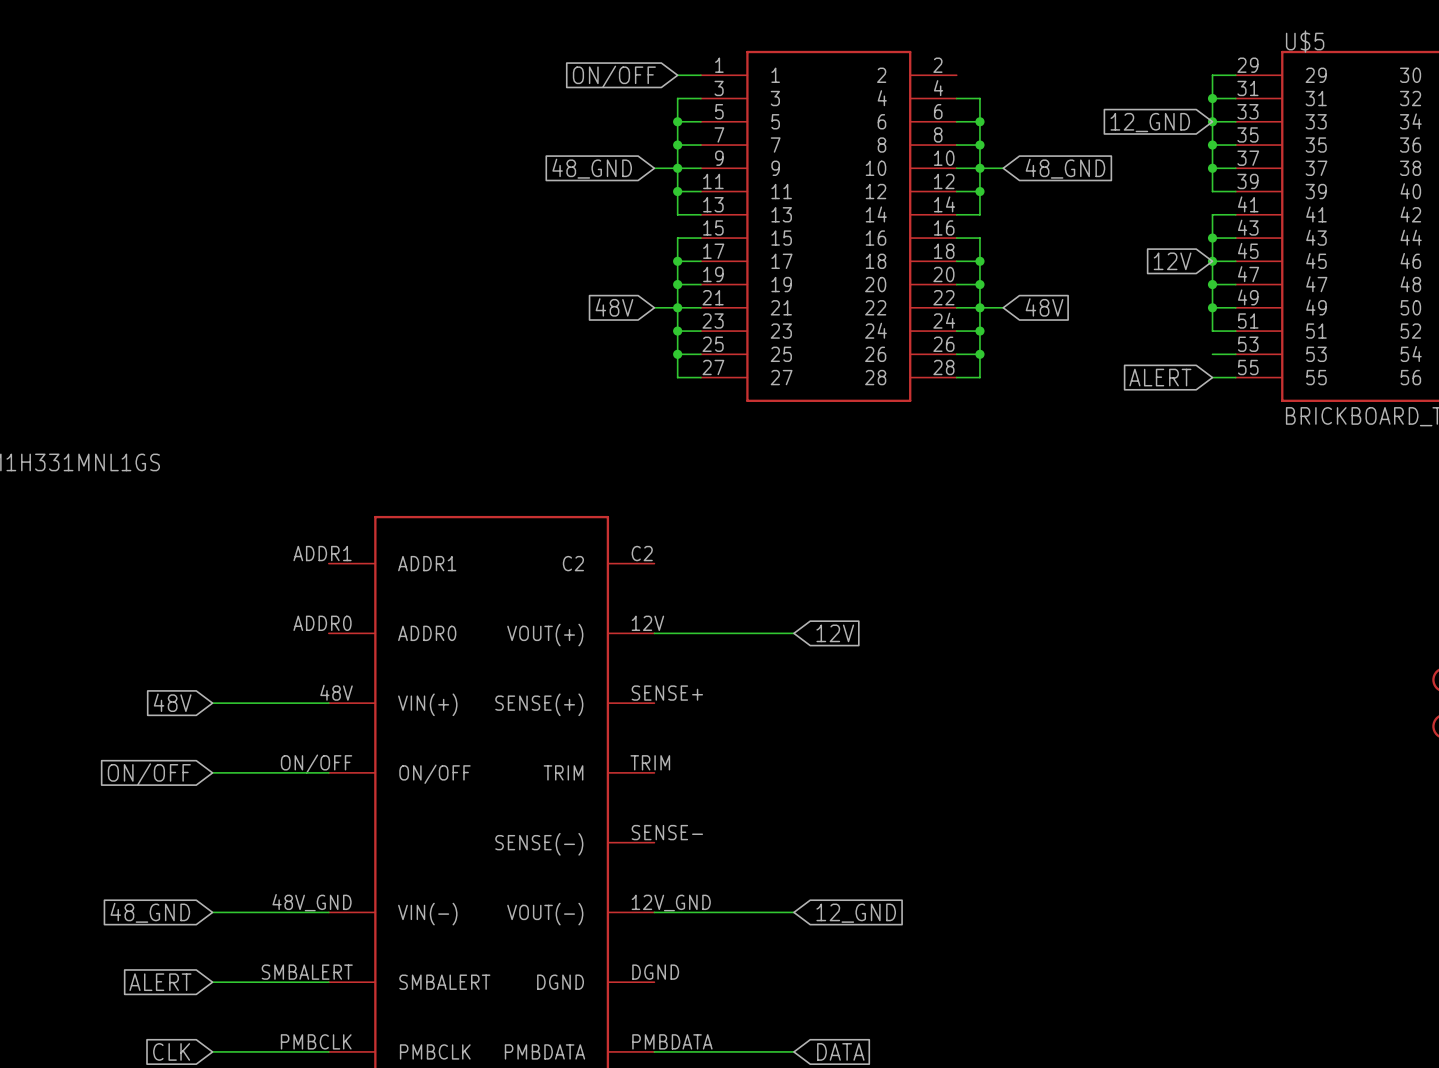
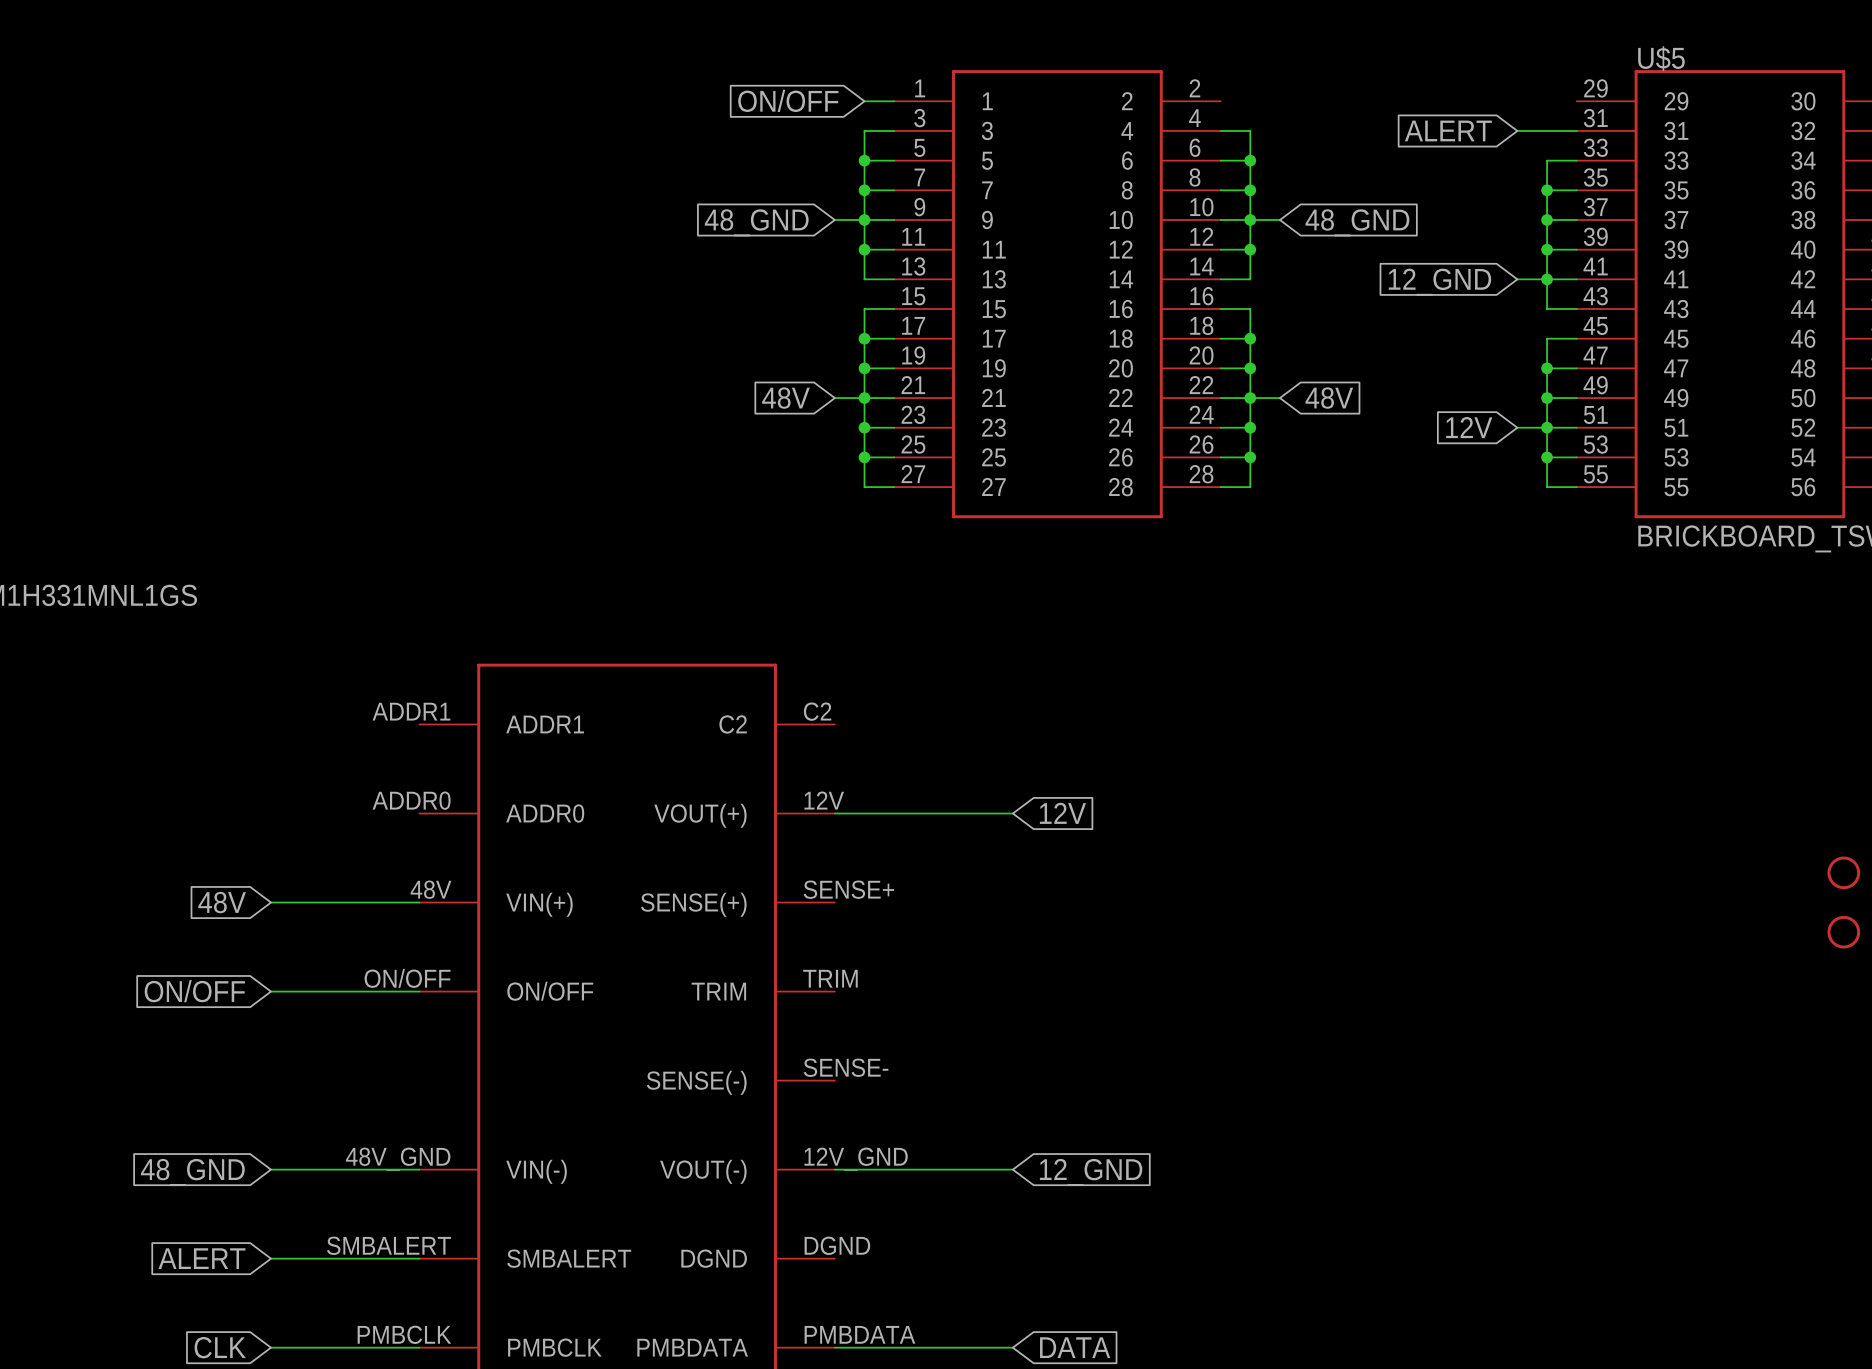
wire: (1235, 75) (1212, 75) (1212, 121) -> none
global label: none -> ALERT (1448, 130)
wire: none -> (1517, 130) (1547, 130)
junction: (1212, 98) -> none
junction: (1212, 121) -> none
global label position: 12_GND (1150, 122) -> 12_GND (1439, 282)
wire: none -> (1547, 249) (1547, 279) (1517, 279)
junction: none -> (1547, 249)
junction: none -> (1547, 279)
wire: (1212, 238) (1212, 261) -> none
junction: (1212, 238) -> none
global label position: 12V (1172, 261) -> 12V (1469, 427)
junction: (1212, 261) -> none
wire: none -> (1517, 427) (1547, 427) (1547, 487)
junction: none -> (1547, 427)
junction: none -> (1547, 457)
global label: ALERT (1160, 377) -> none

